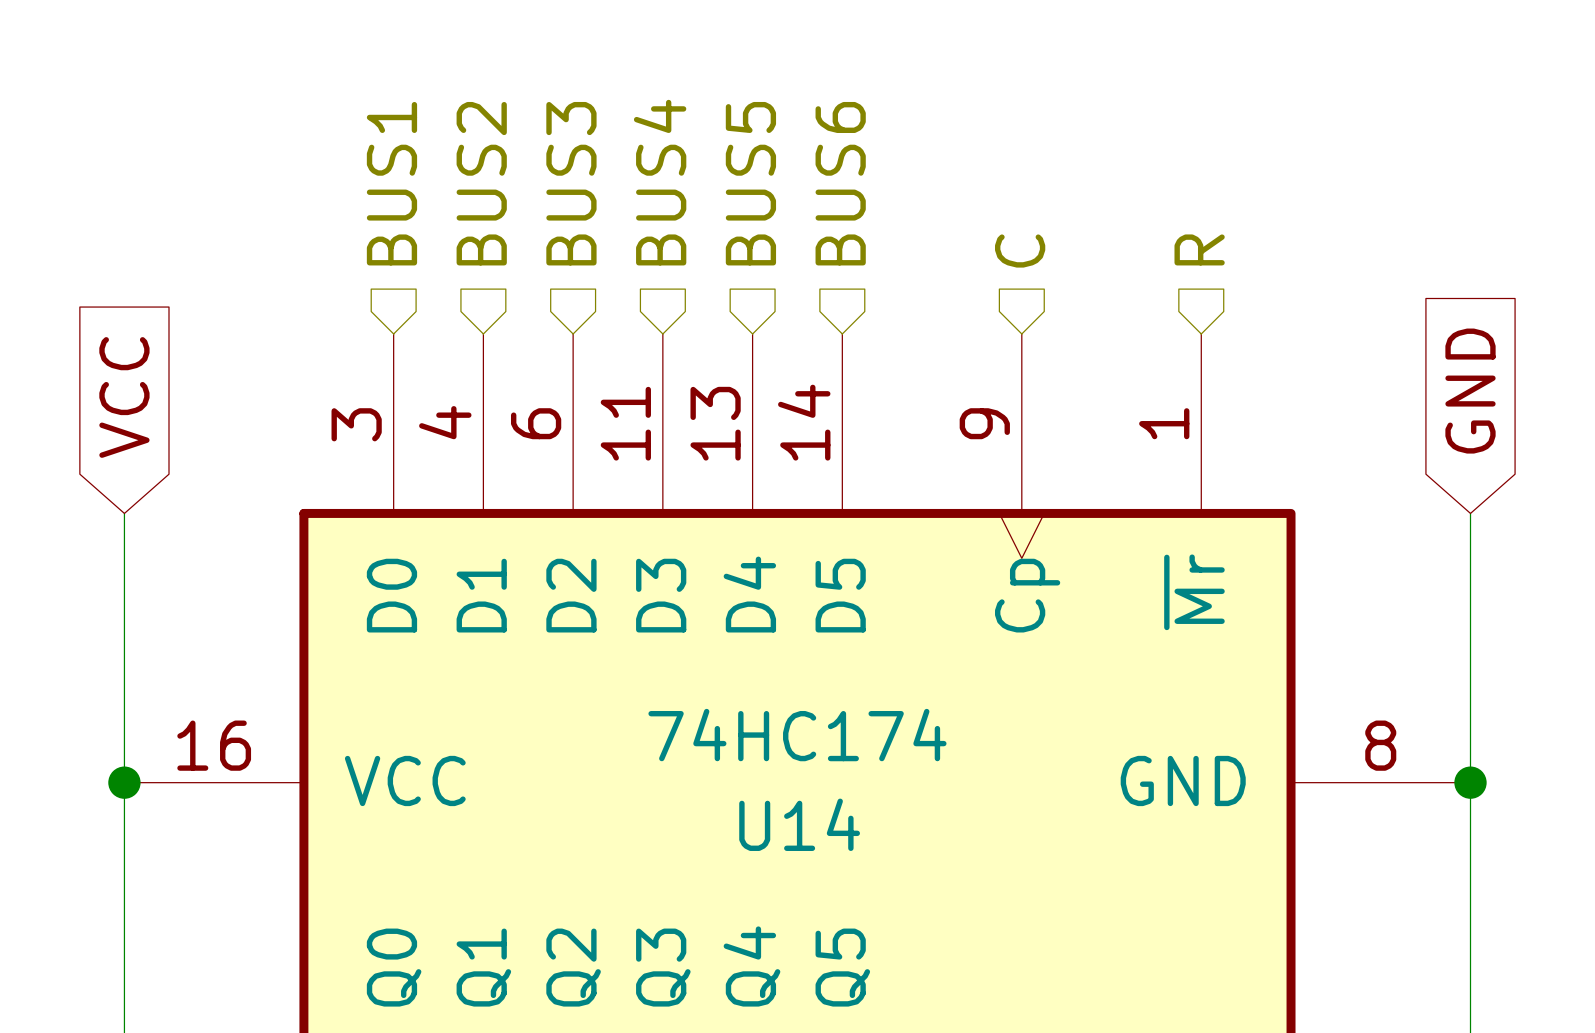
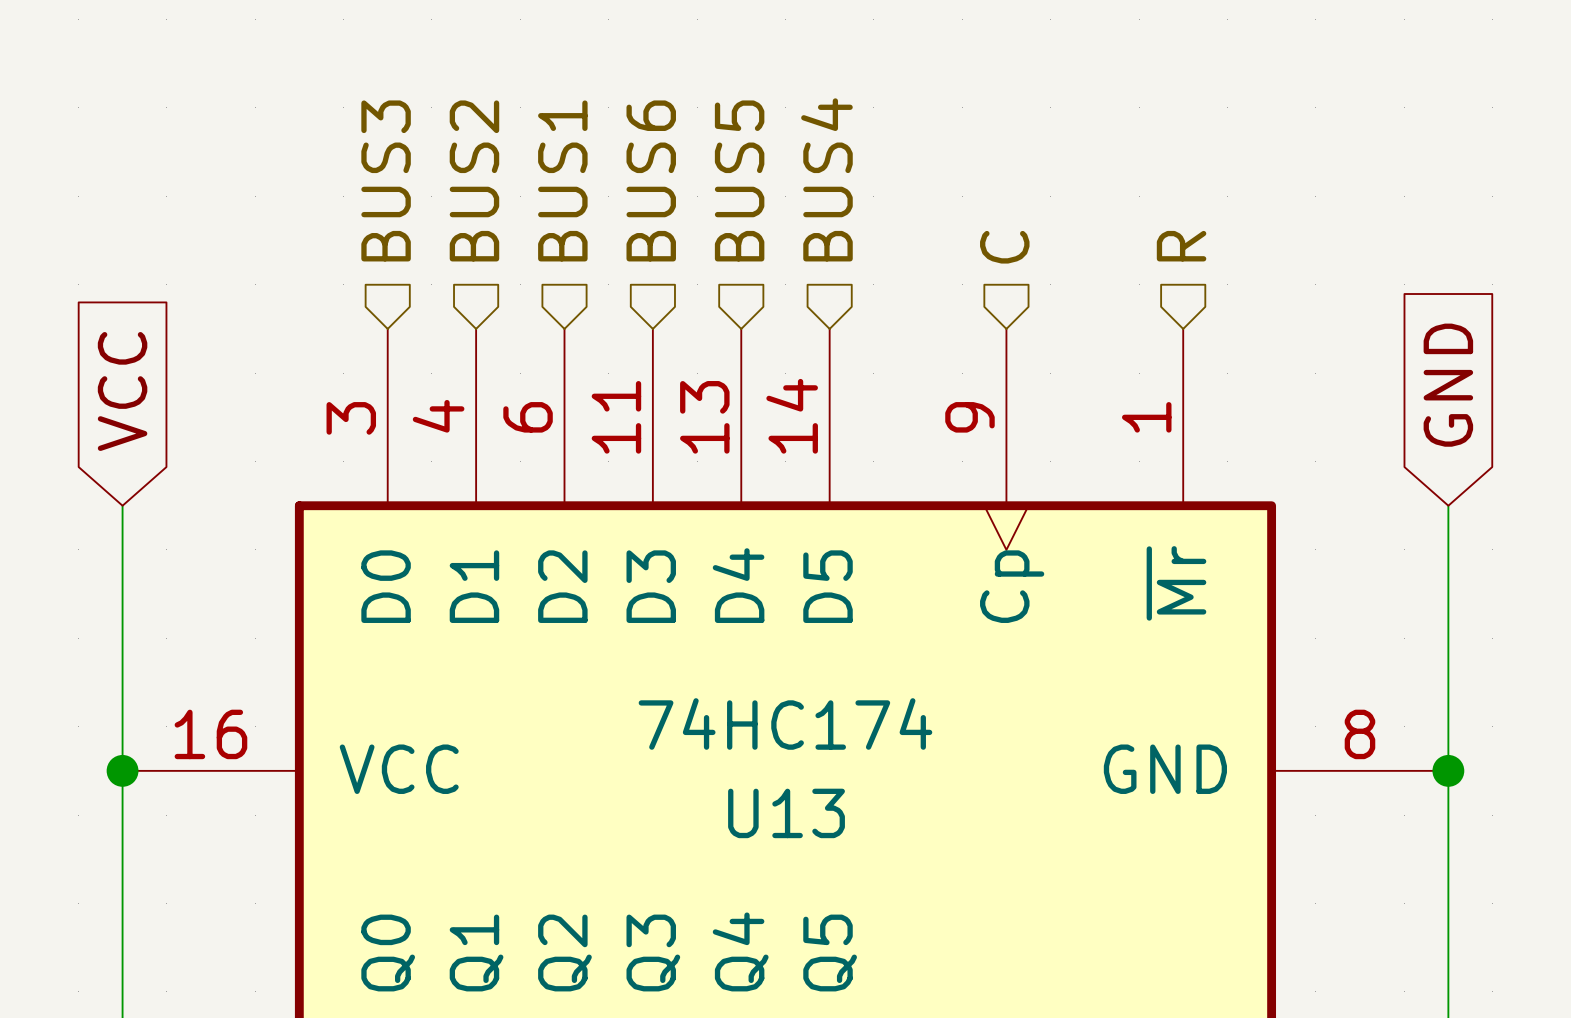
hierarchical label: BUS4 (660, 182) -> BUS6 (651, 180)
hierarchical label: BUS1 (391, 183) -> BUS3 (386, 180)
hierarchical label: BUS3 (571, 183) -> BUS1 (562, 180)
hierarchical label: BUS6 (840, 183) -> BUS4 (826, 179)
U14 name: U14 (799, 824) -> U13 (786, 813)

